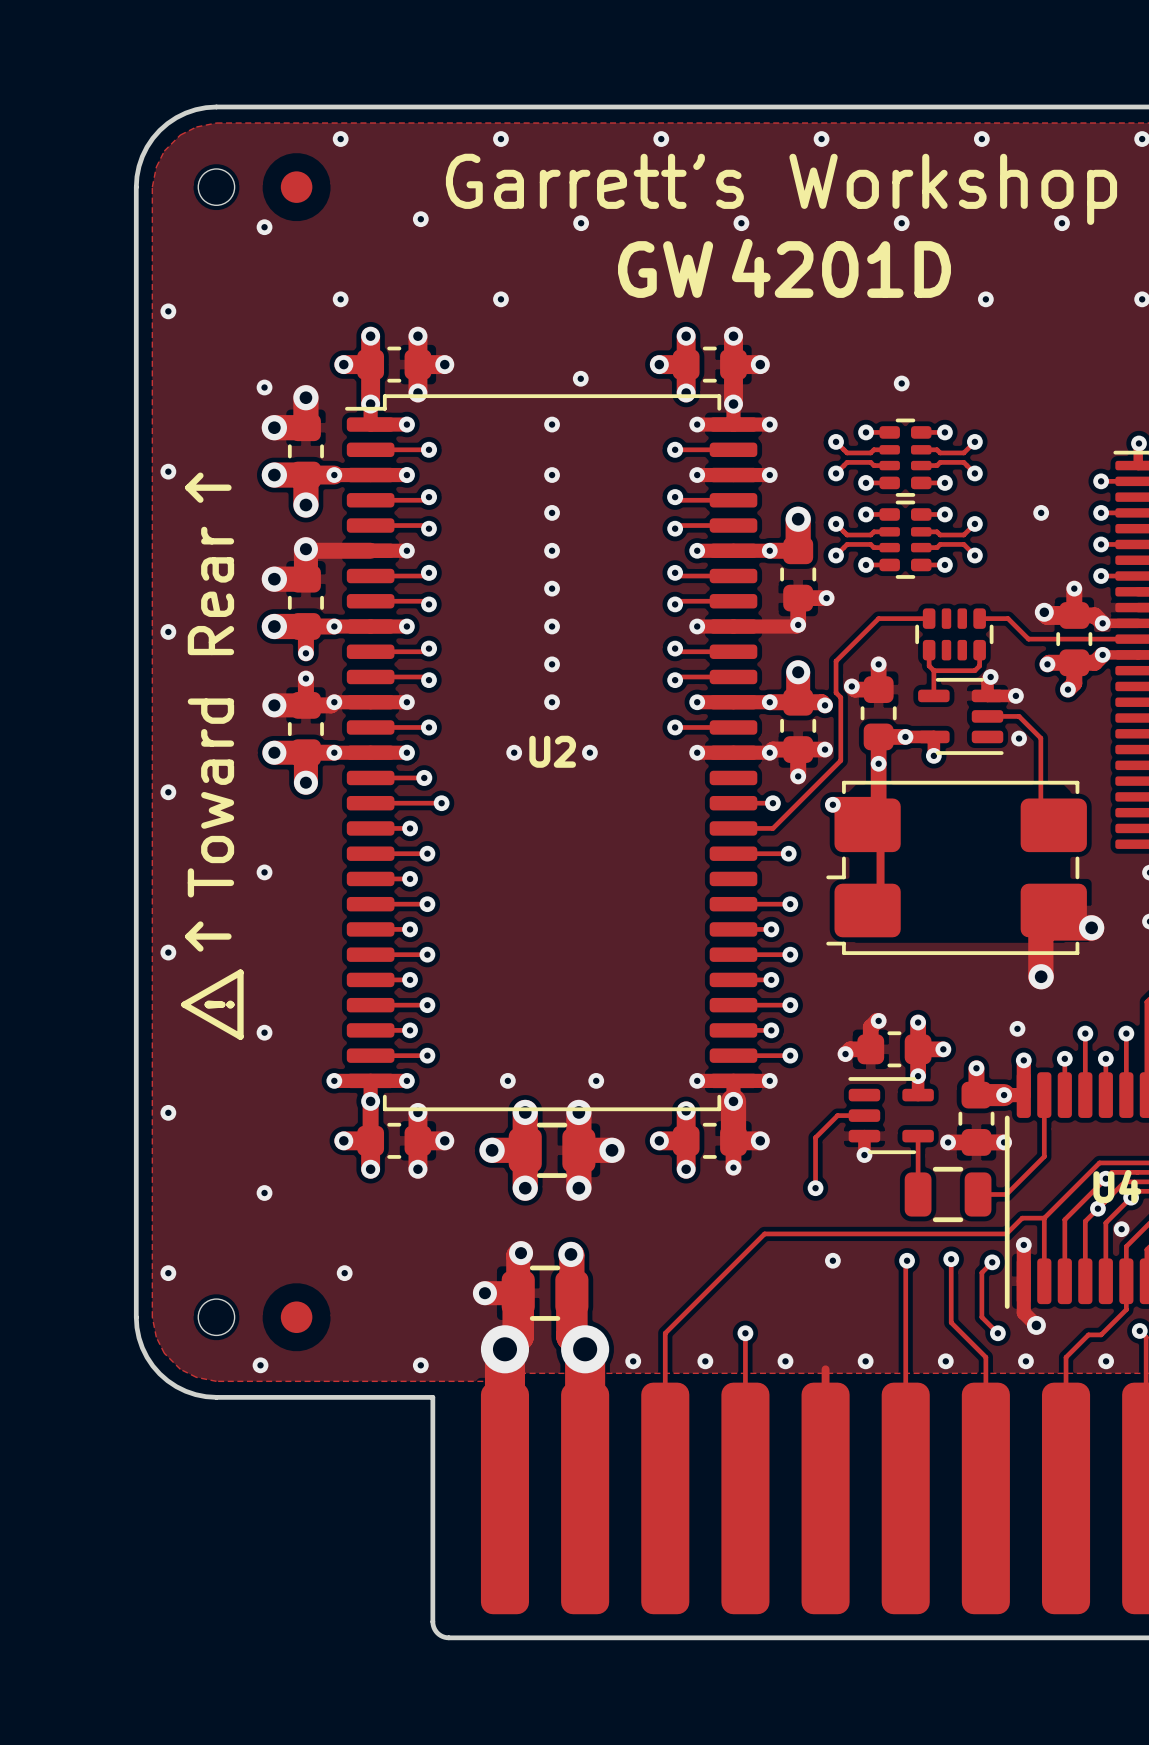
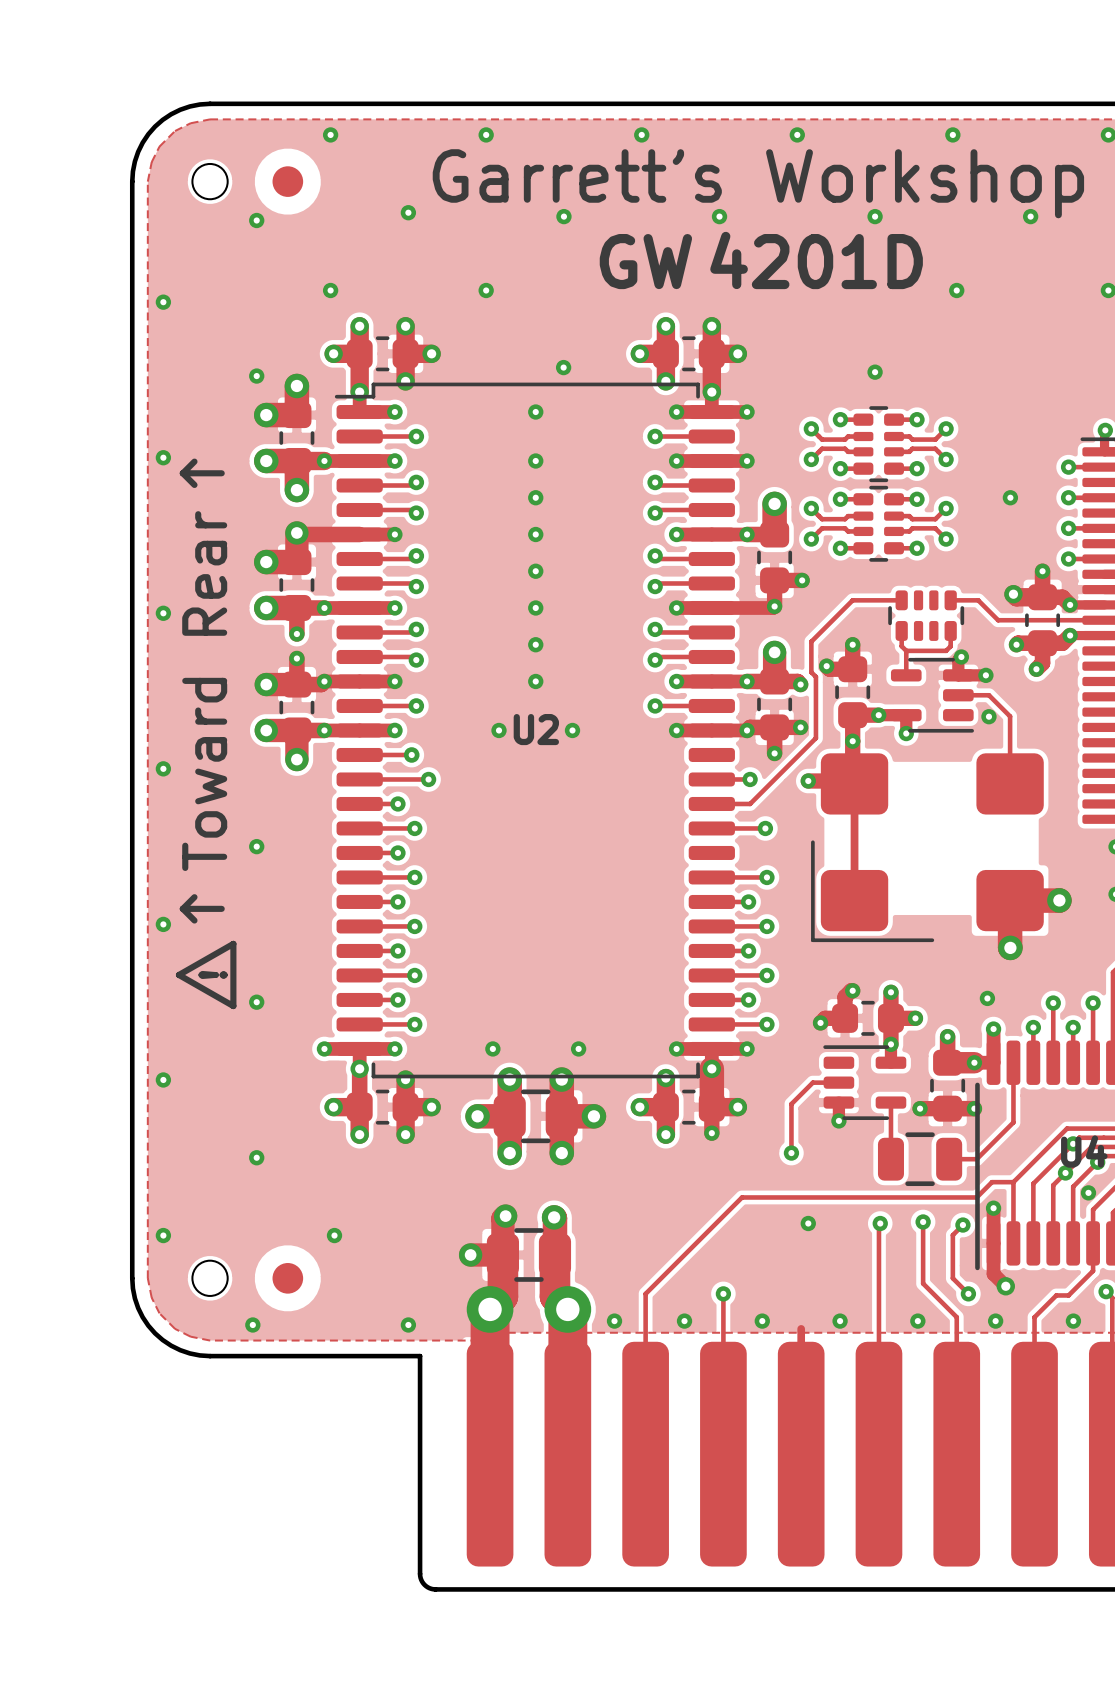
part footprint: [826, 780, 1087, 955] -> [811, 753, 1044, 943]

